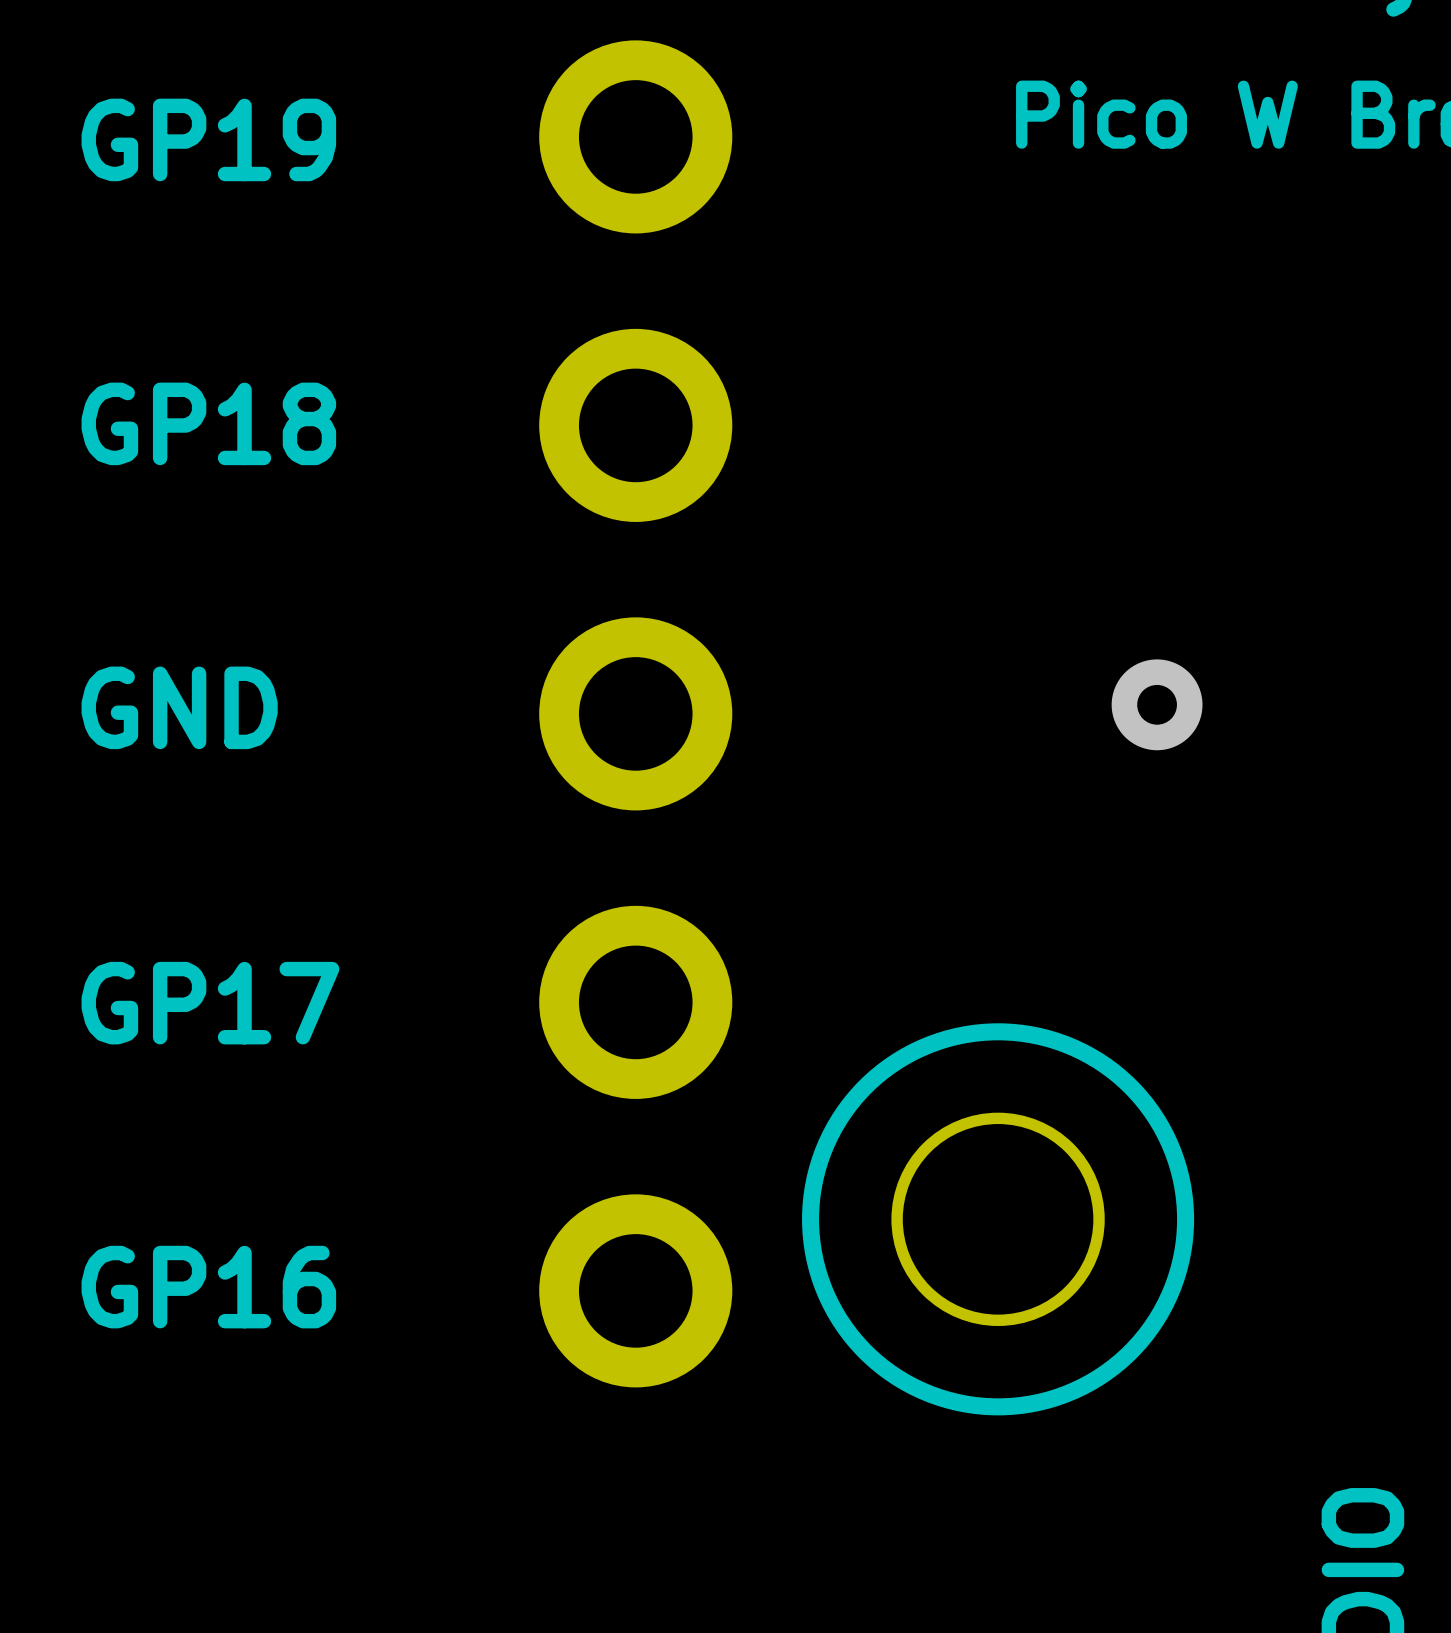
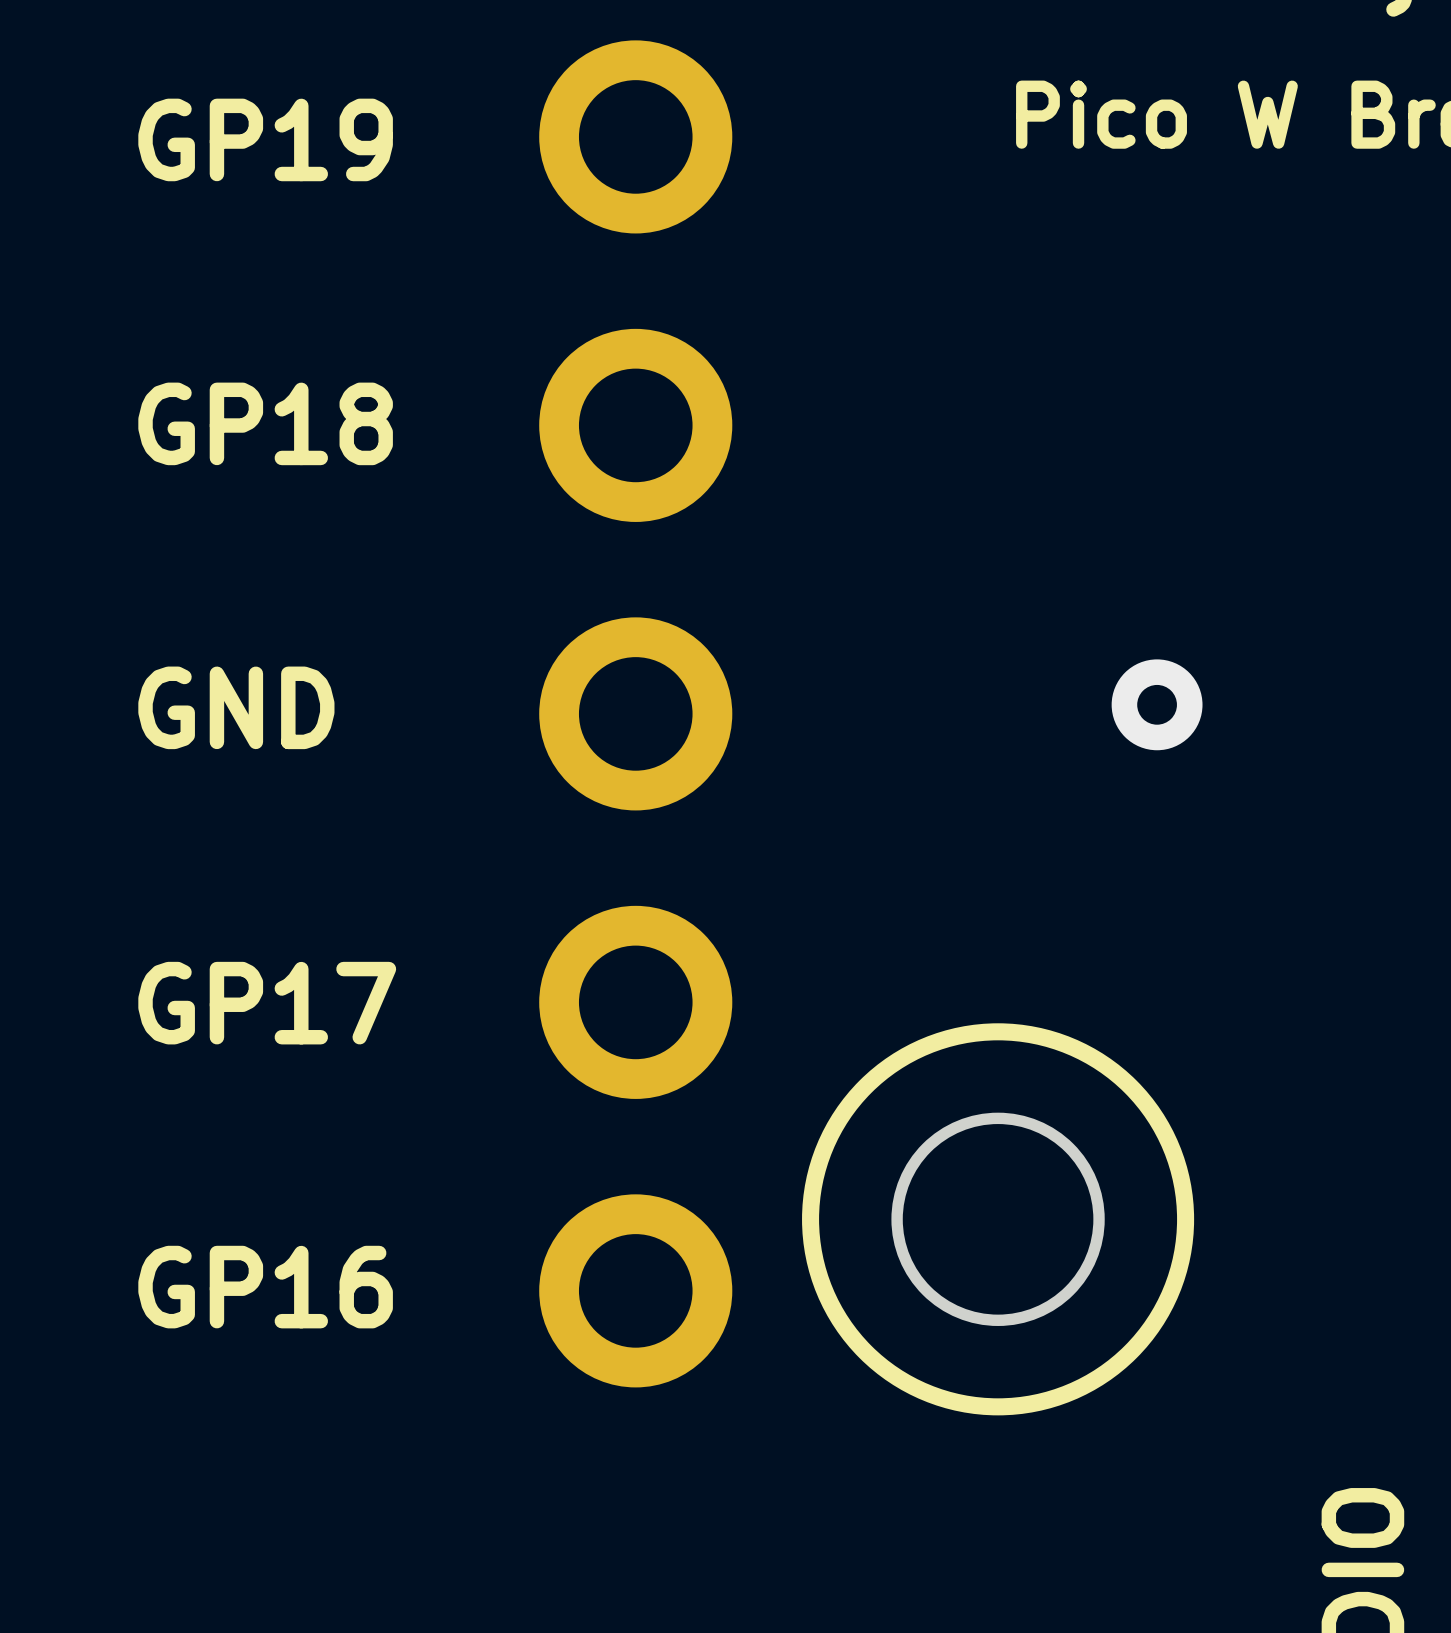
text position: GP19 (208, 139) -> GP19 (265, 139)
text position: GP18 (208, 423) -> GP18 (265, 423)
text position: GND (179, 707) -> GND (236, 707)
text position: GP17 (210, 1003) -> GP17 (267, 1003)
text position: GP16 (208, 1287) -> GP16 (265, 1287)

